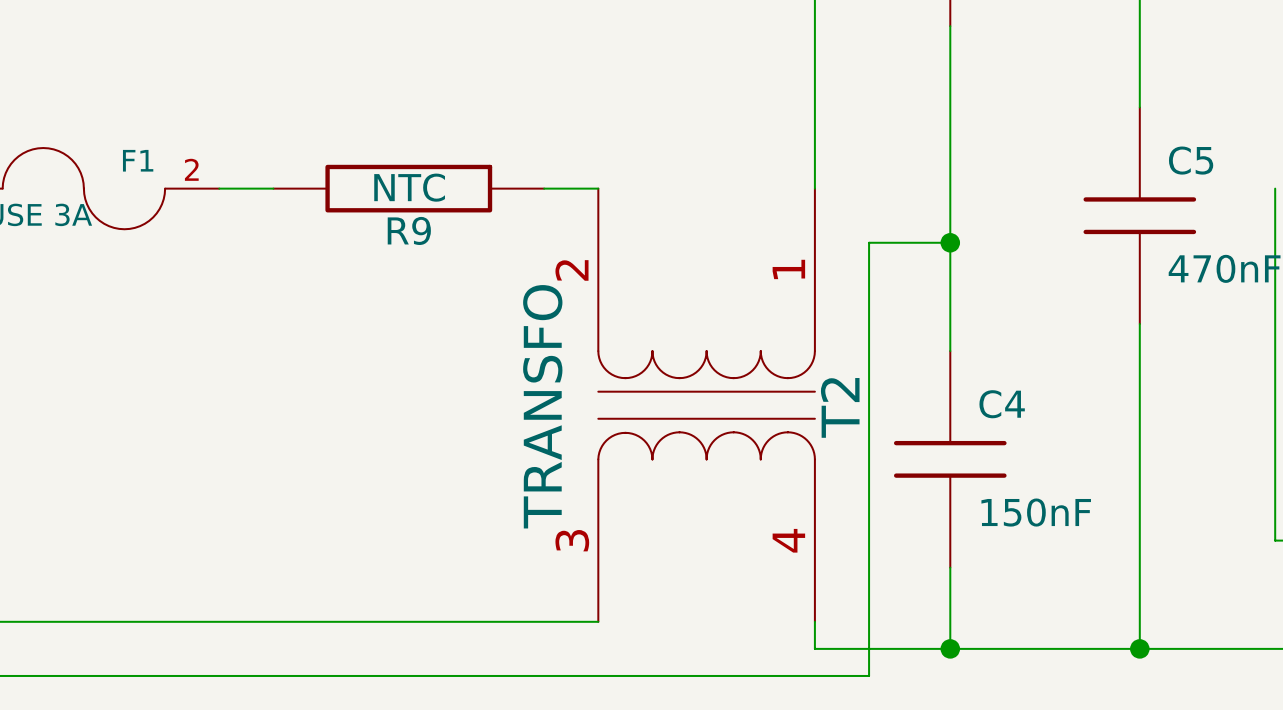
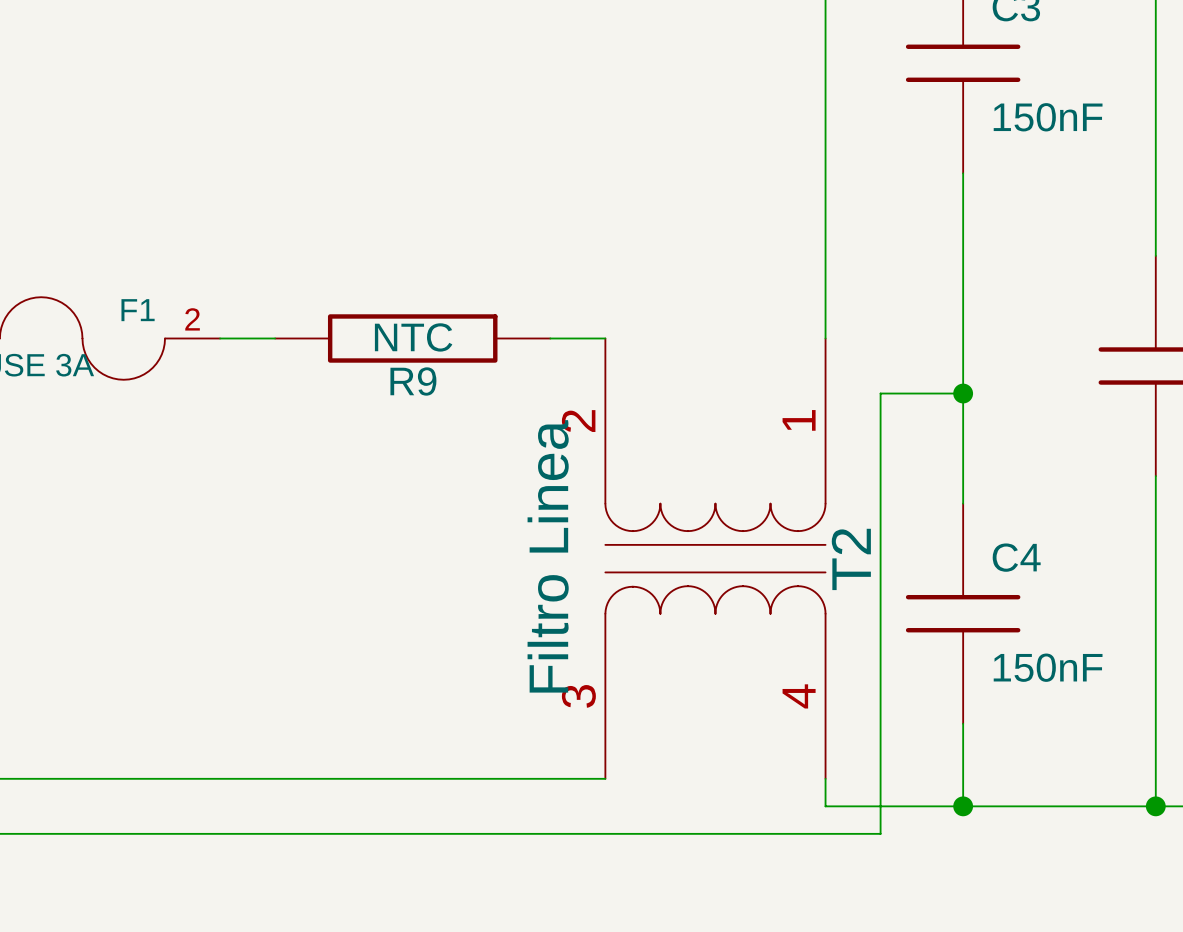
T2 value: TRANSFO (542, 406) -> Filtro Linea (548, 556)

